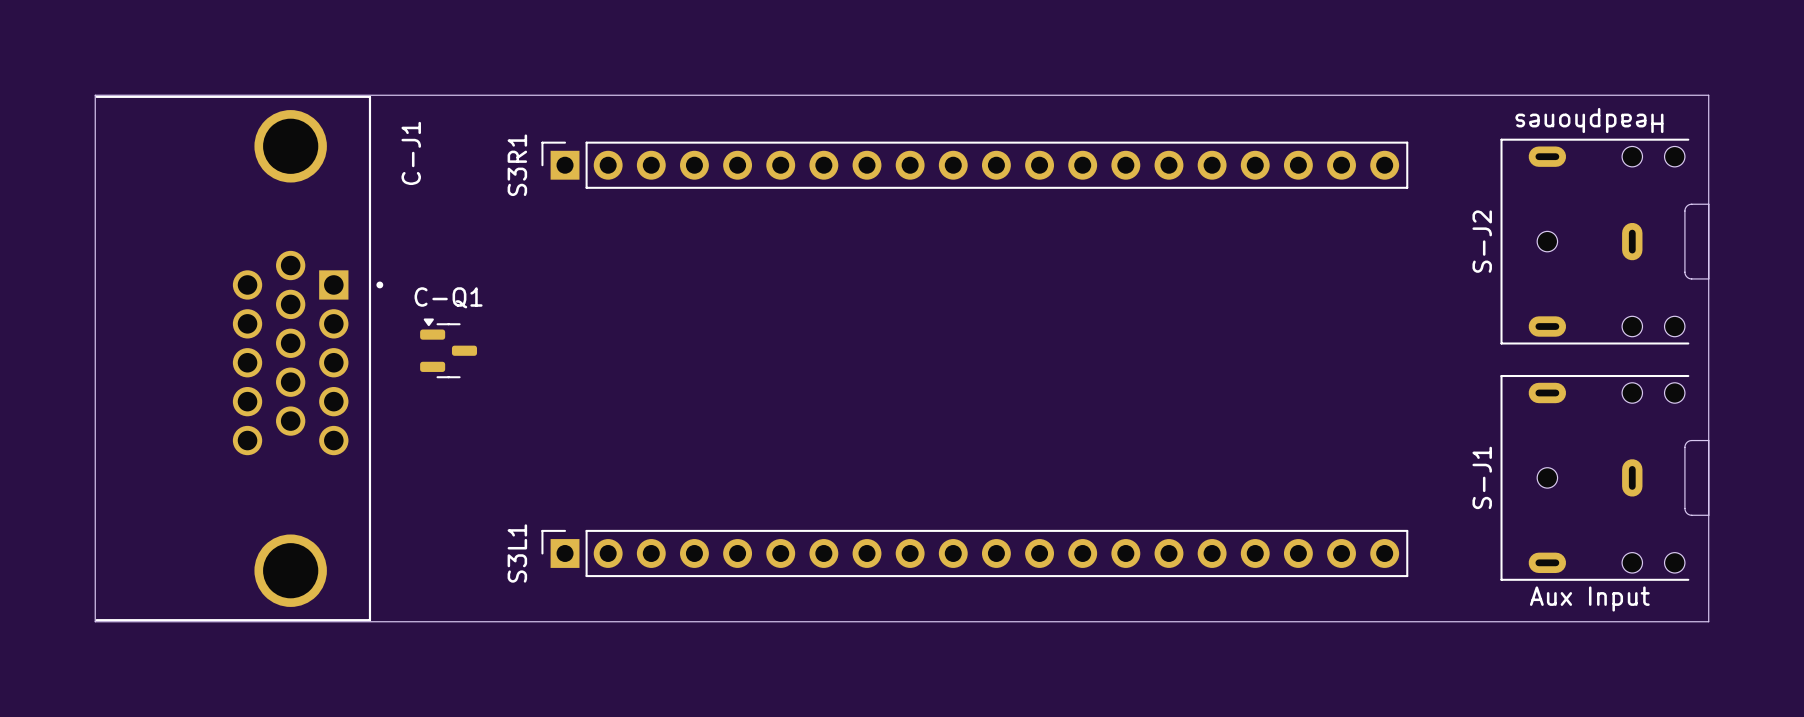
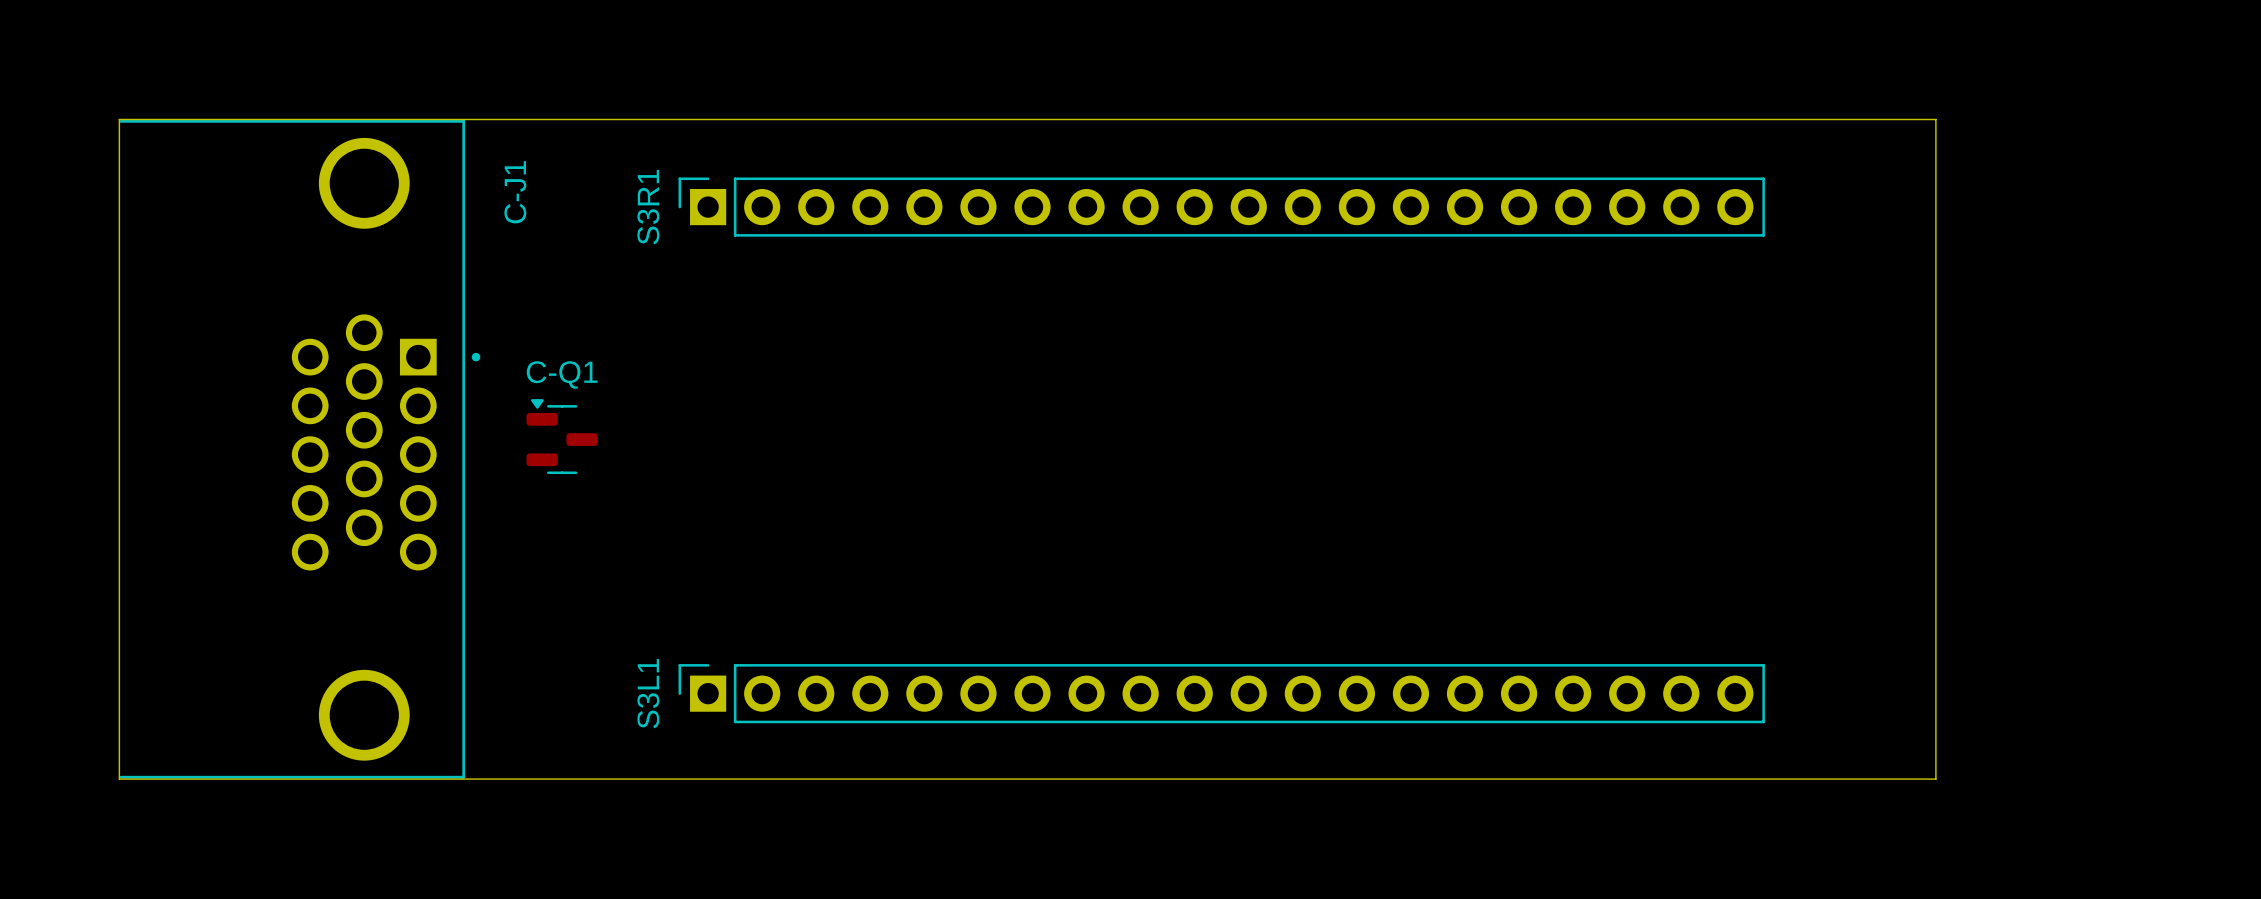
board edge: (95, 95) (1708, 95) (1708, 621) (95, 621) -> (119, 119) (1935, 119) (1935, 779) (119, 779)
S-J2: Headphones (1604, 241) -> none
S-J1: Aux Input (1604, 477) -> none

